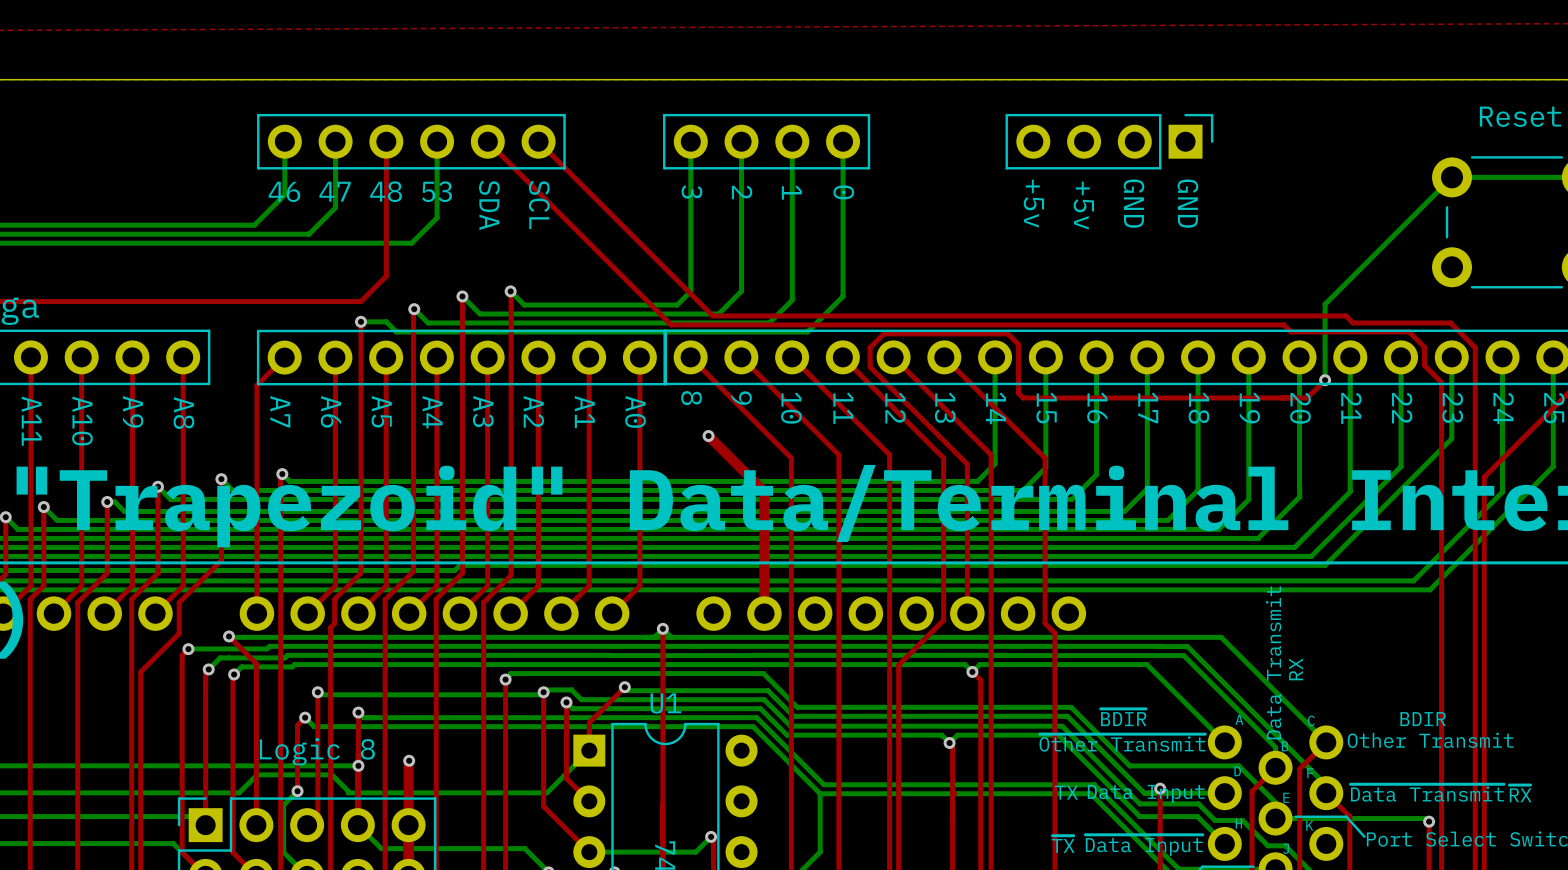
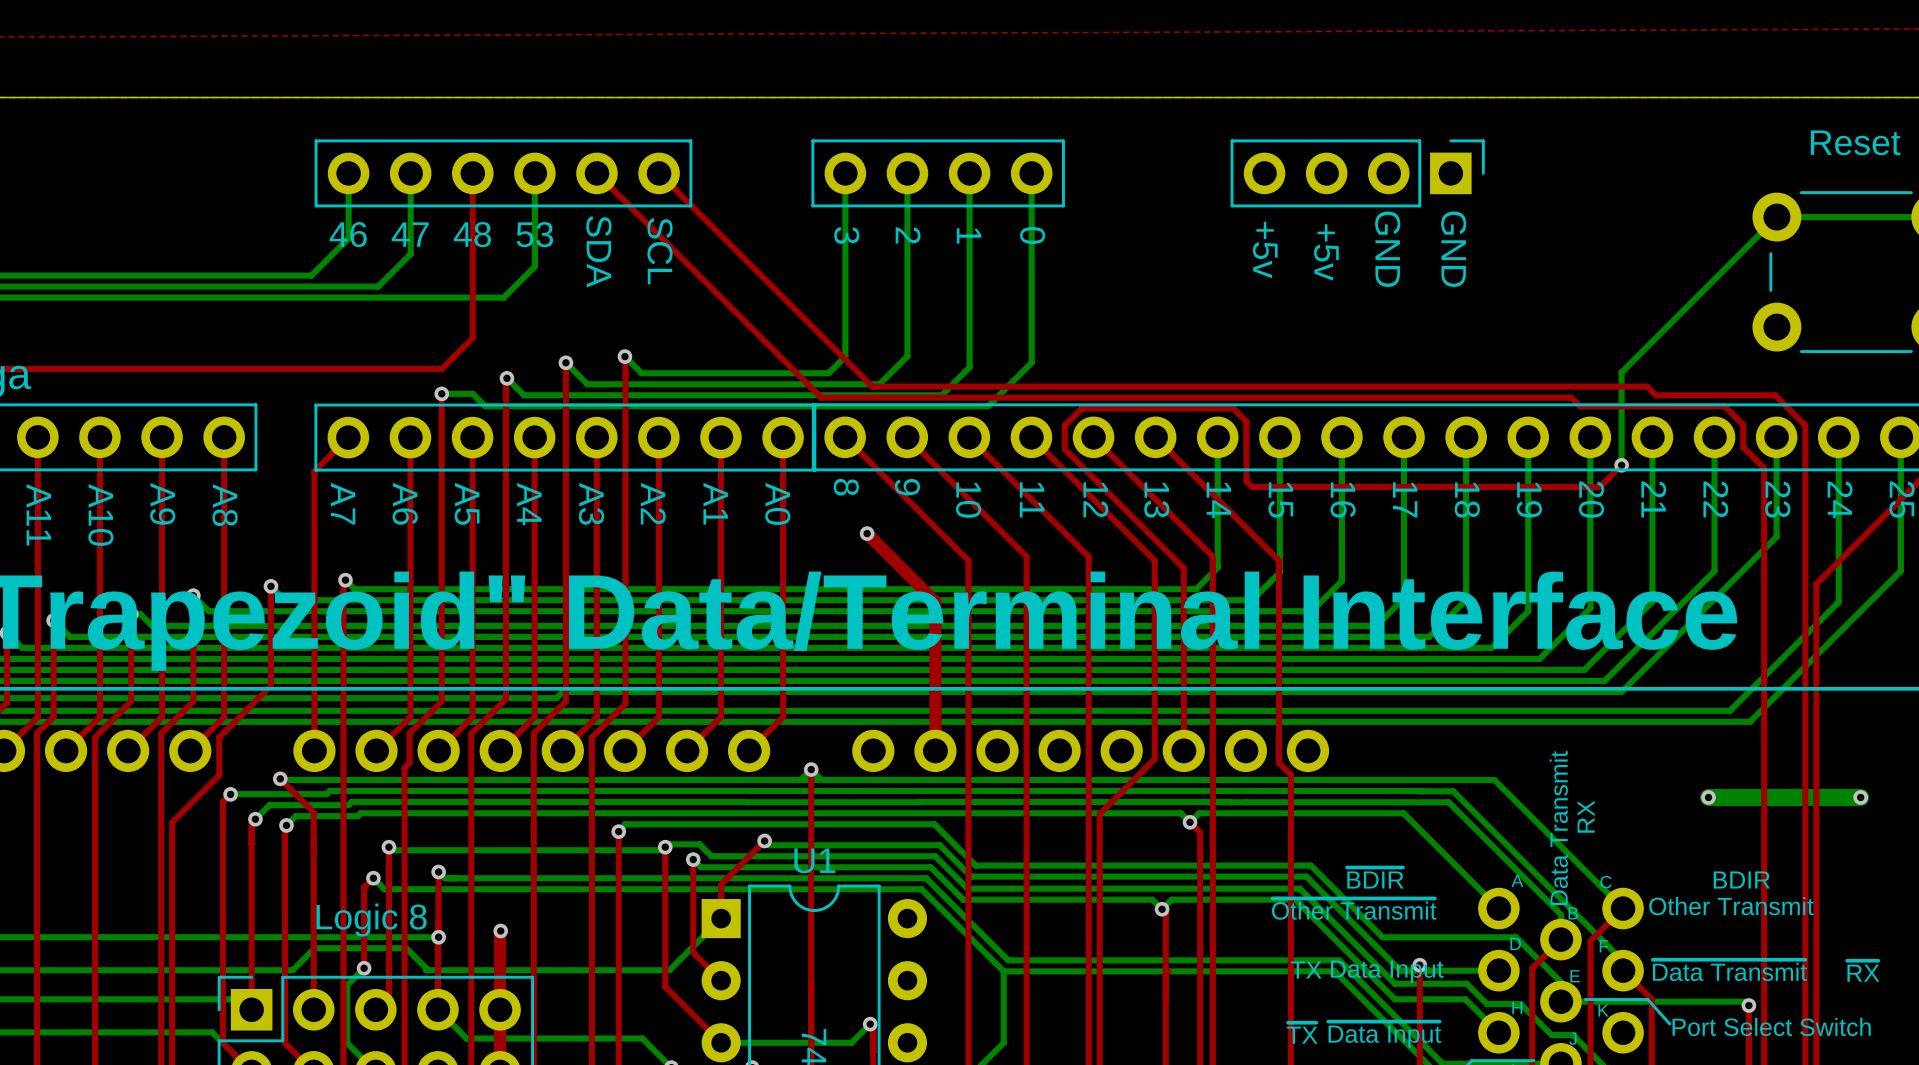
bottom track: none -> (1708, 797) (1860, 797)
via: none -> (1708, 797)
via: none -> (1860, 797)

